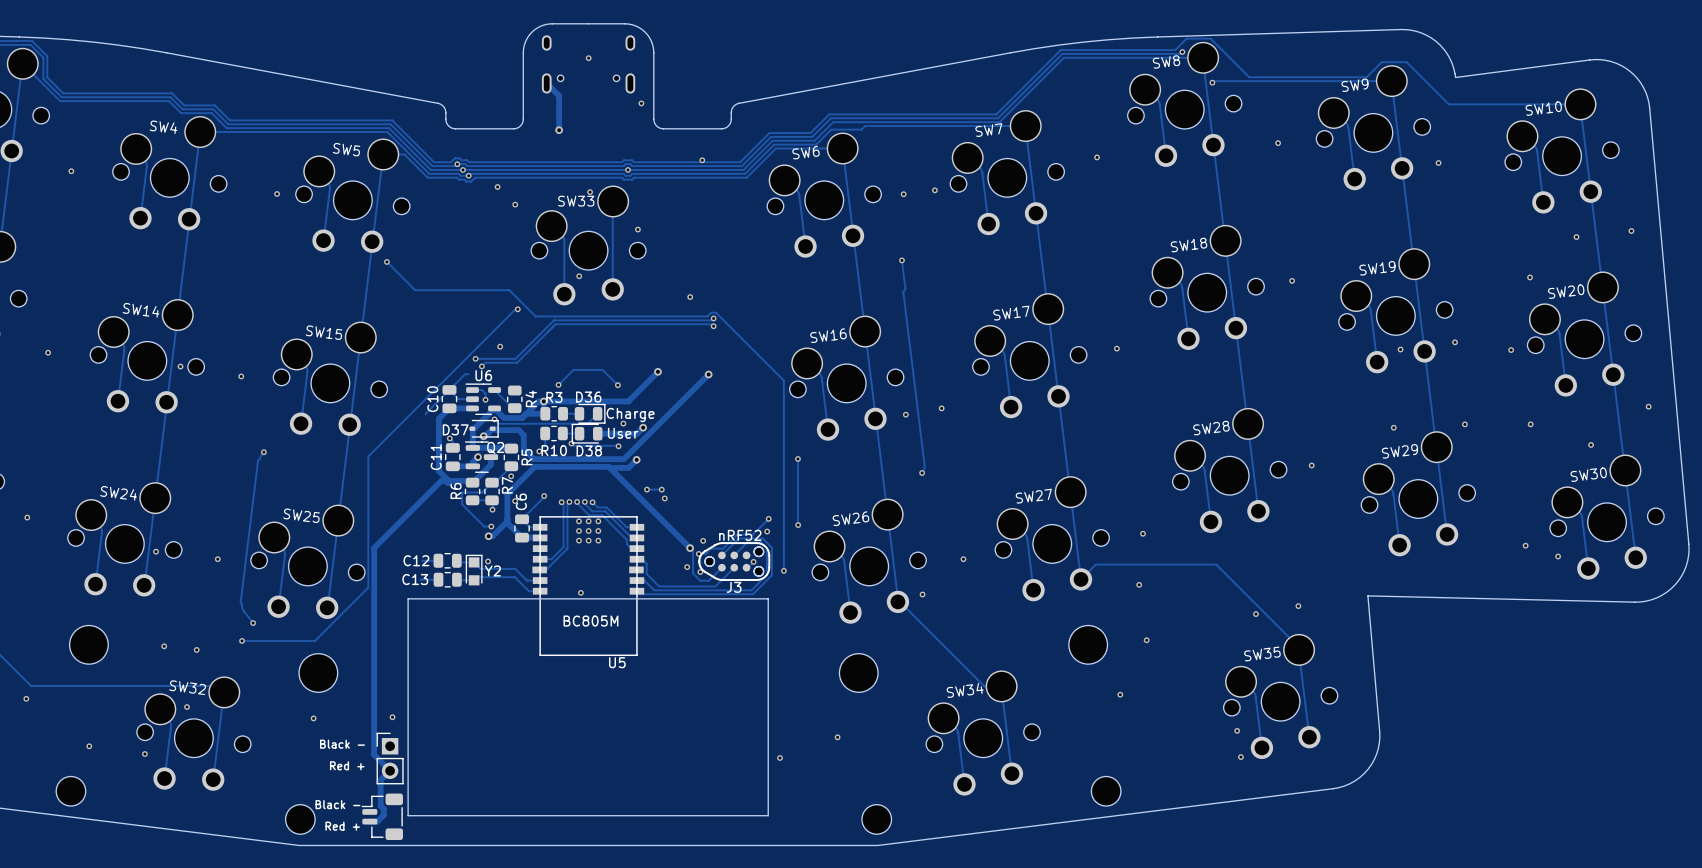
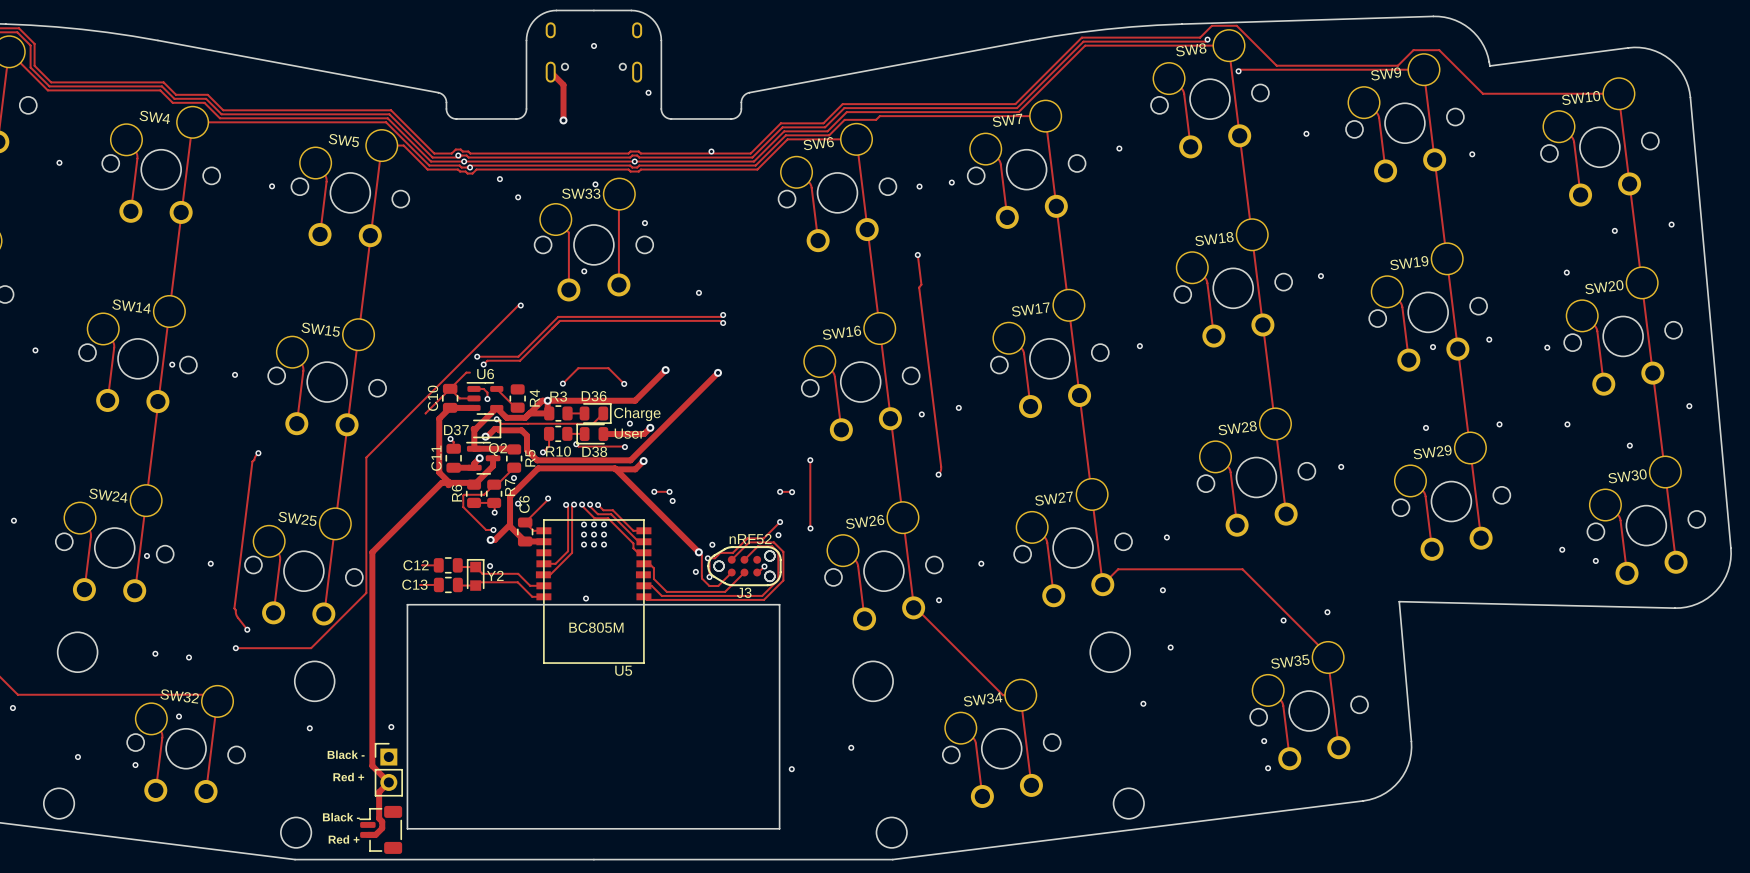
track: (386, 261) (415, 290) (509, 290) (535, 316) (707, 316) (711, 312) (716, 312) (783, 380) (783, 570) -> none
via: (386, 261) -> none
via: (500, 346) -> none
track: none -> (780, 491) (792, 492)
via: none -> (780, 491)
via: none -> (792, 492)
via: (783, 570) -> none

